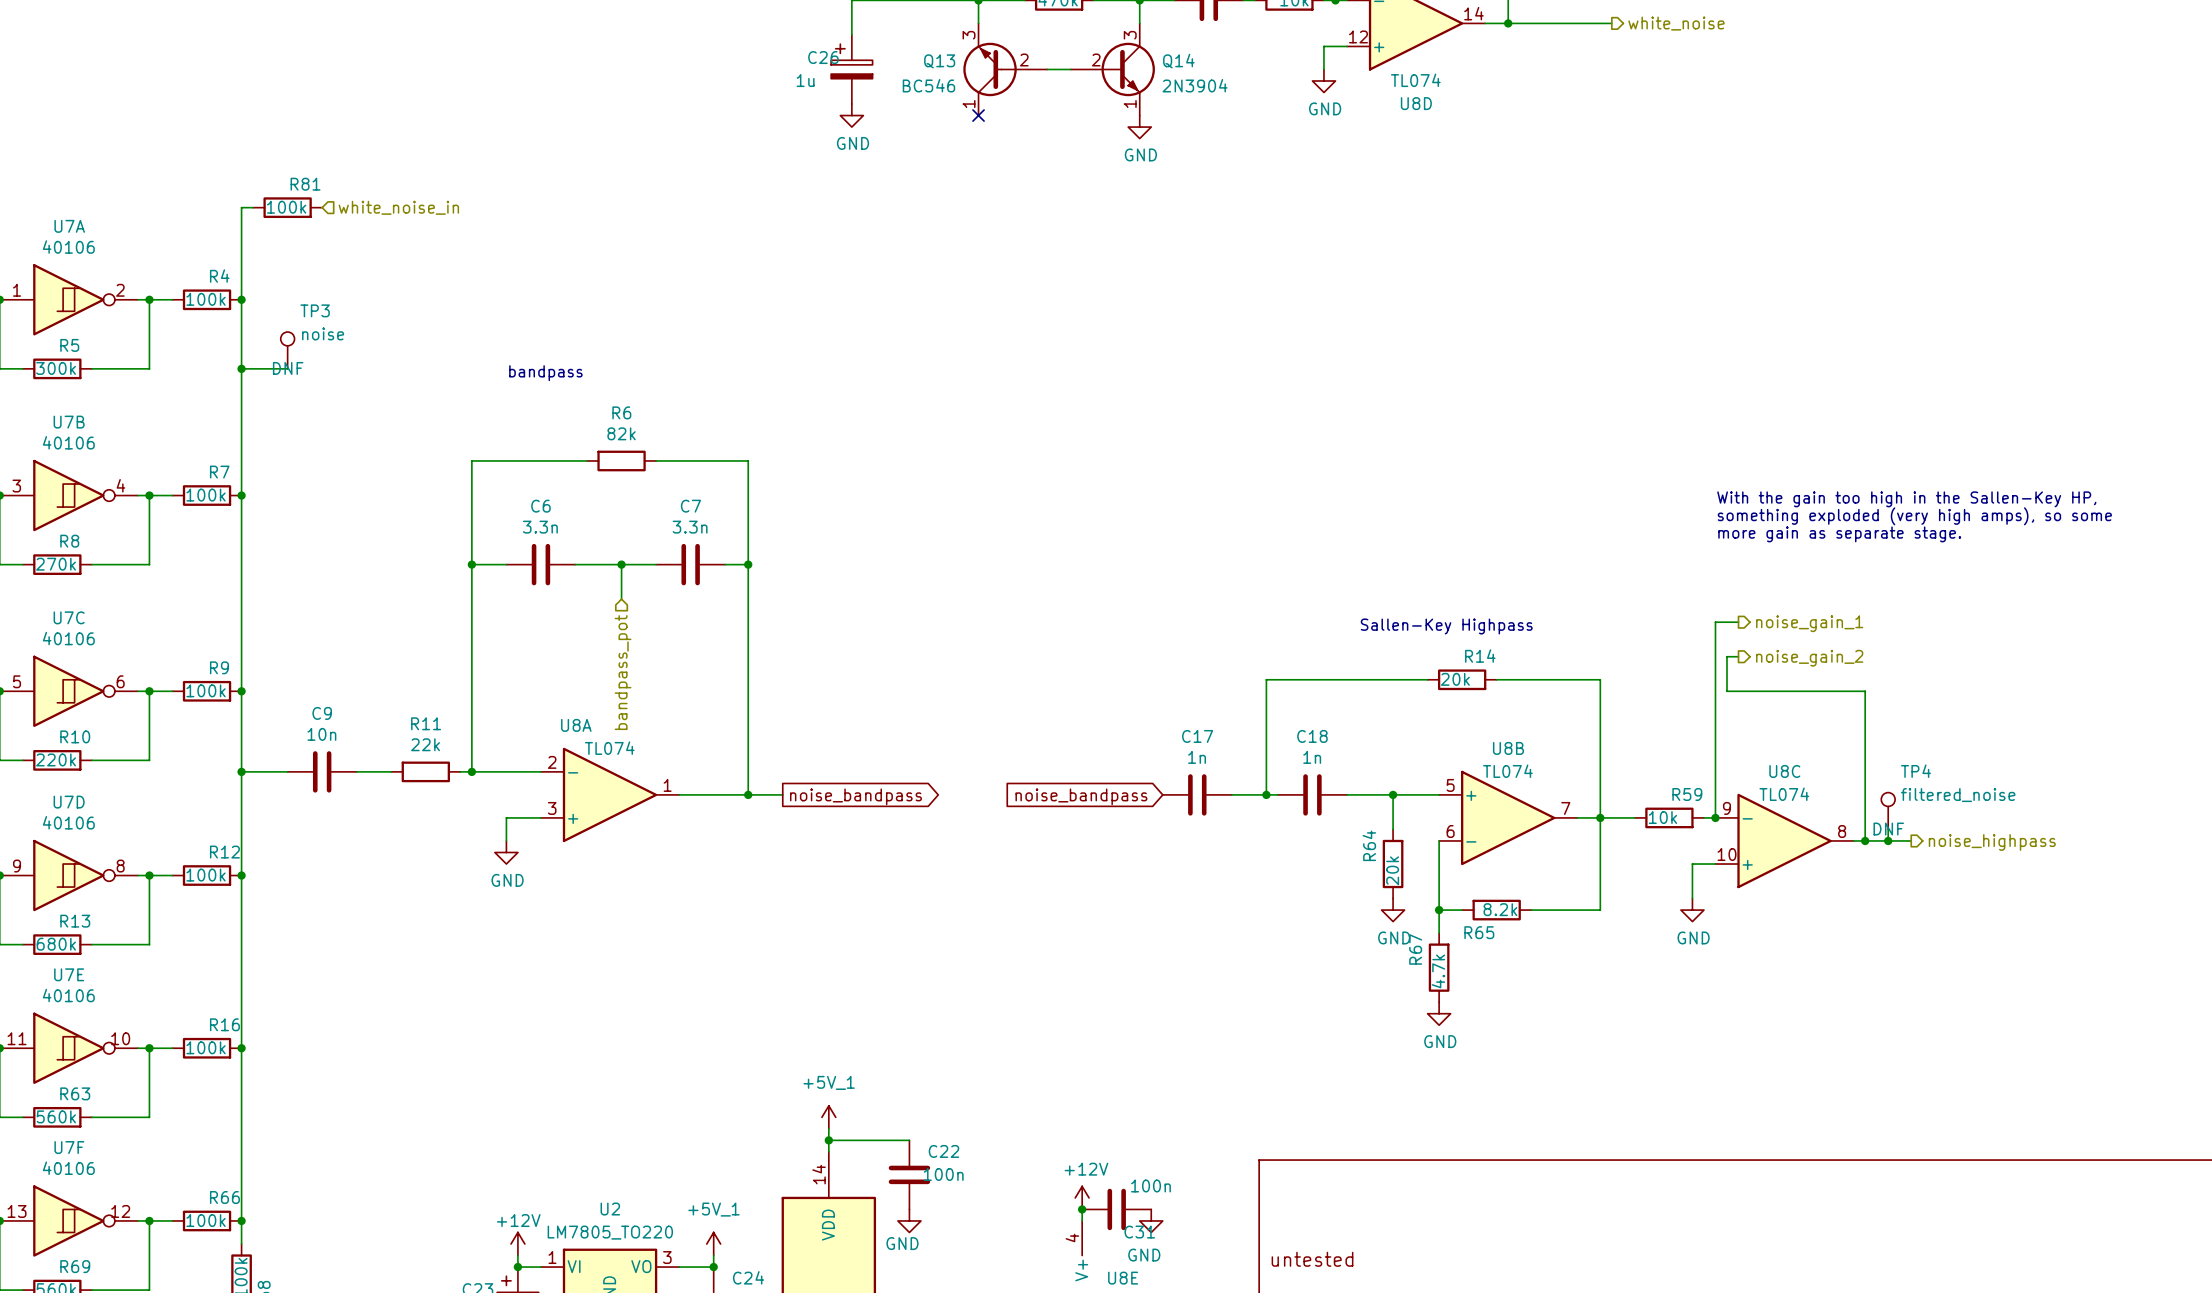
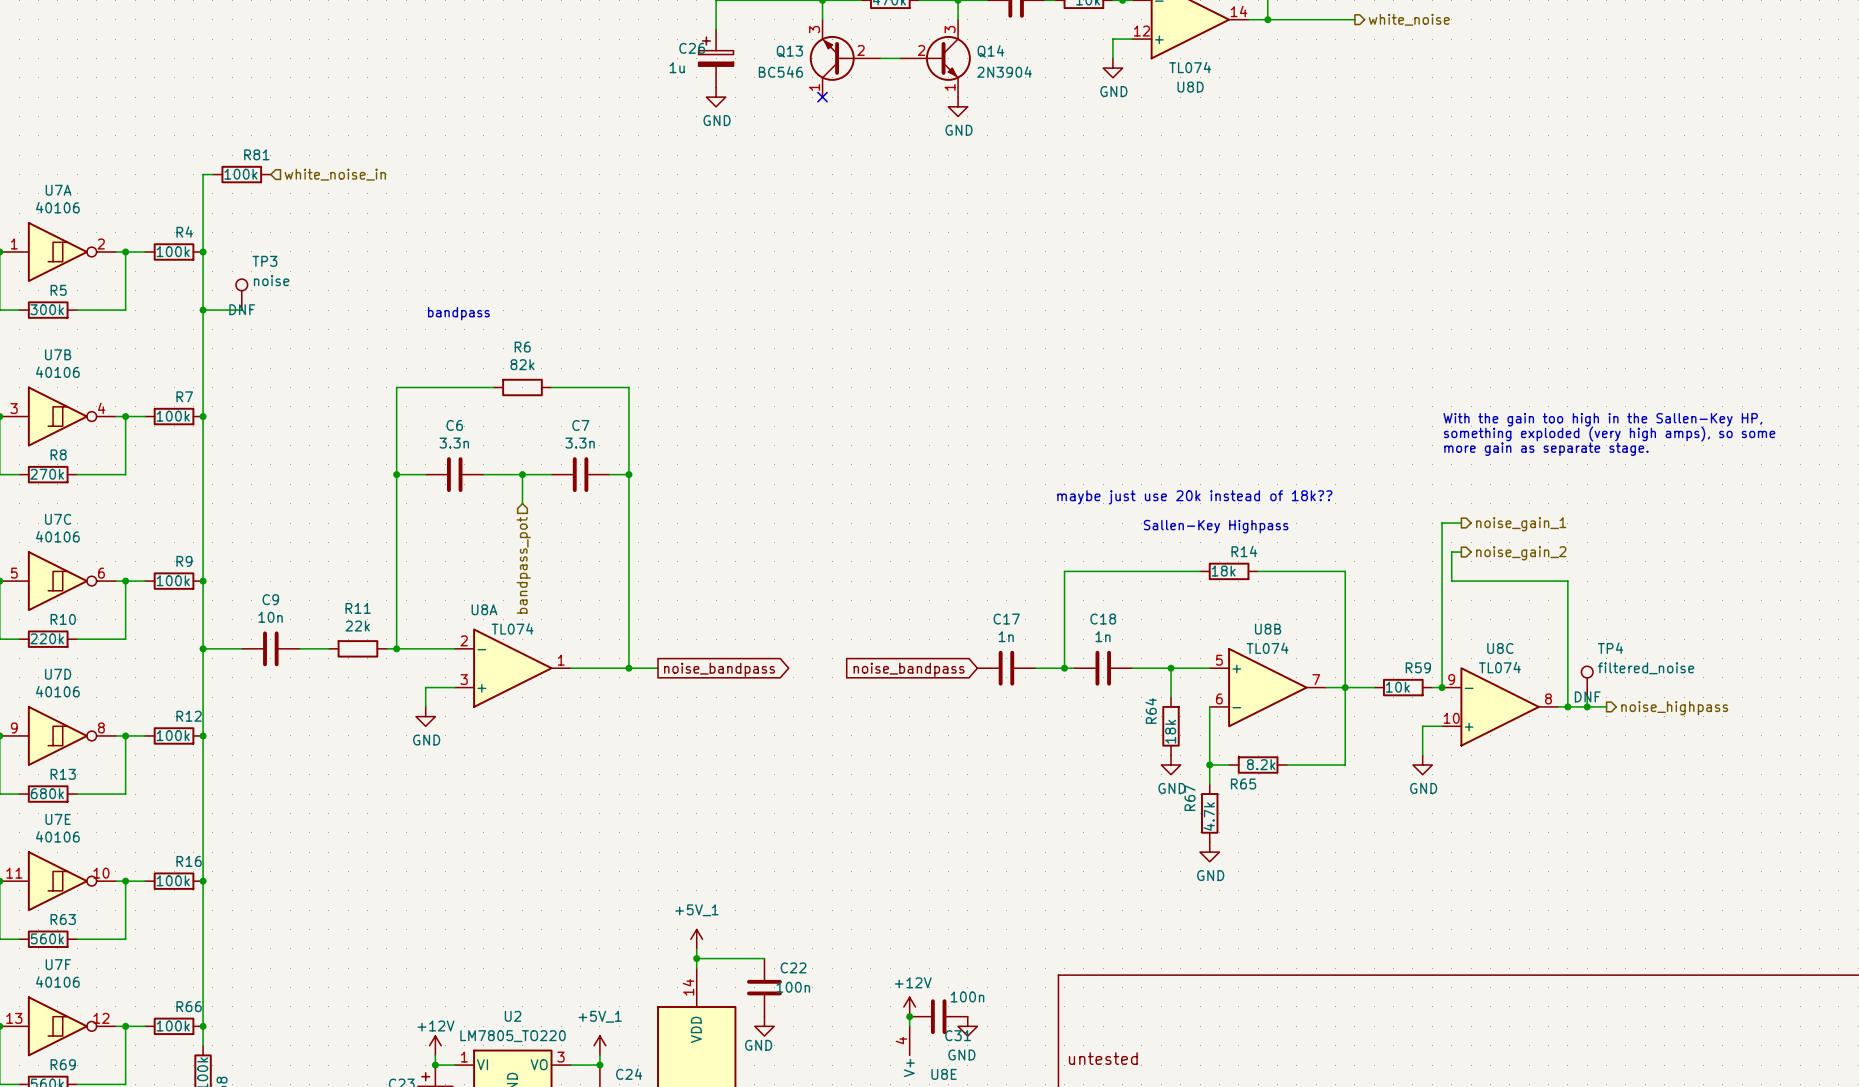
text: none -> maybe just use 20k instead of 18k?? (1194, 497)
R14 value: 20k (1455, 679) -> 18k (1223, 571)
R64 value: 20k (1392, 870) -> 18k (1170, 731)

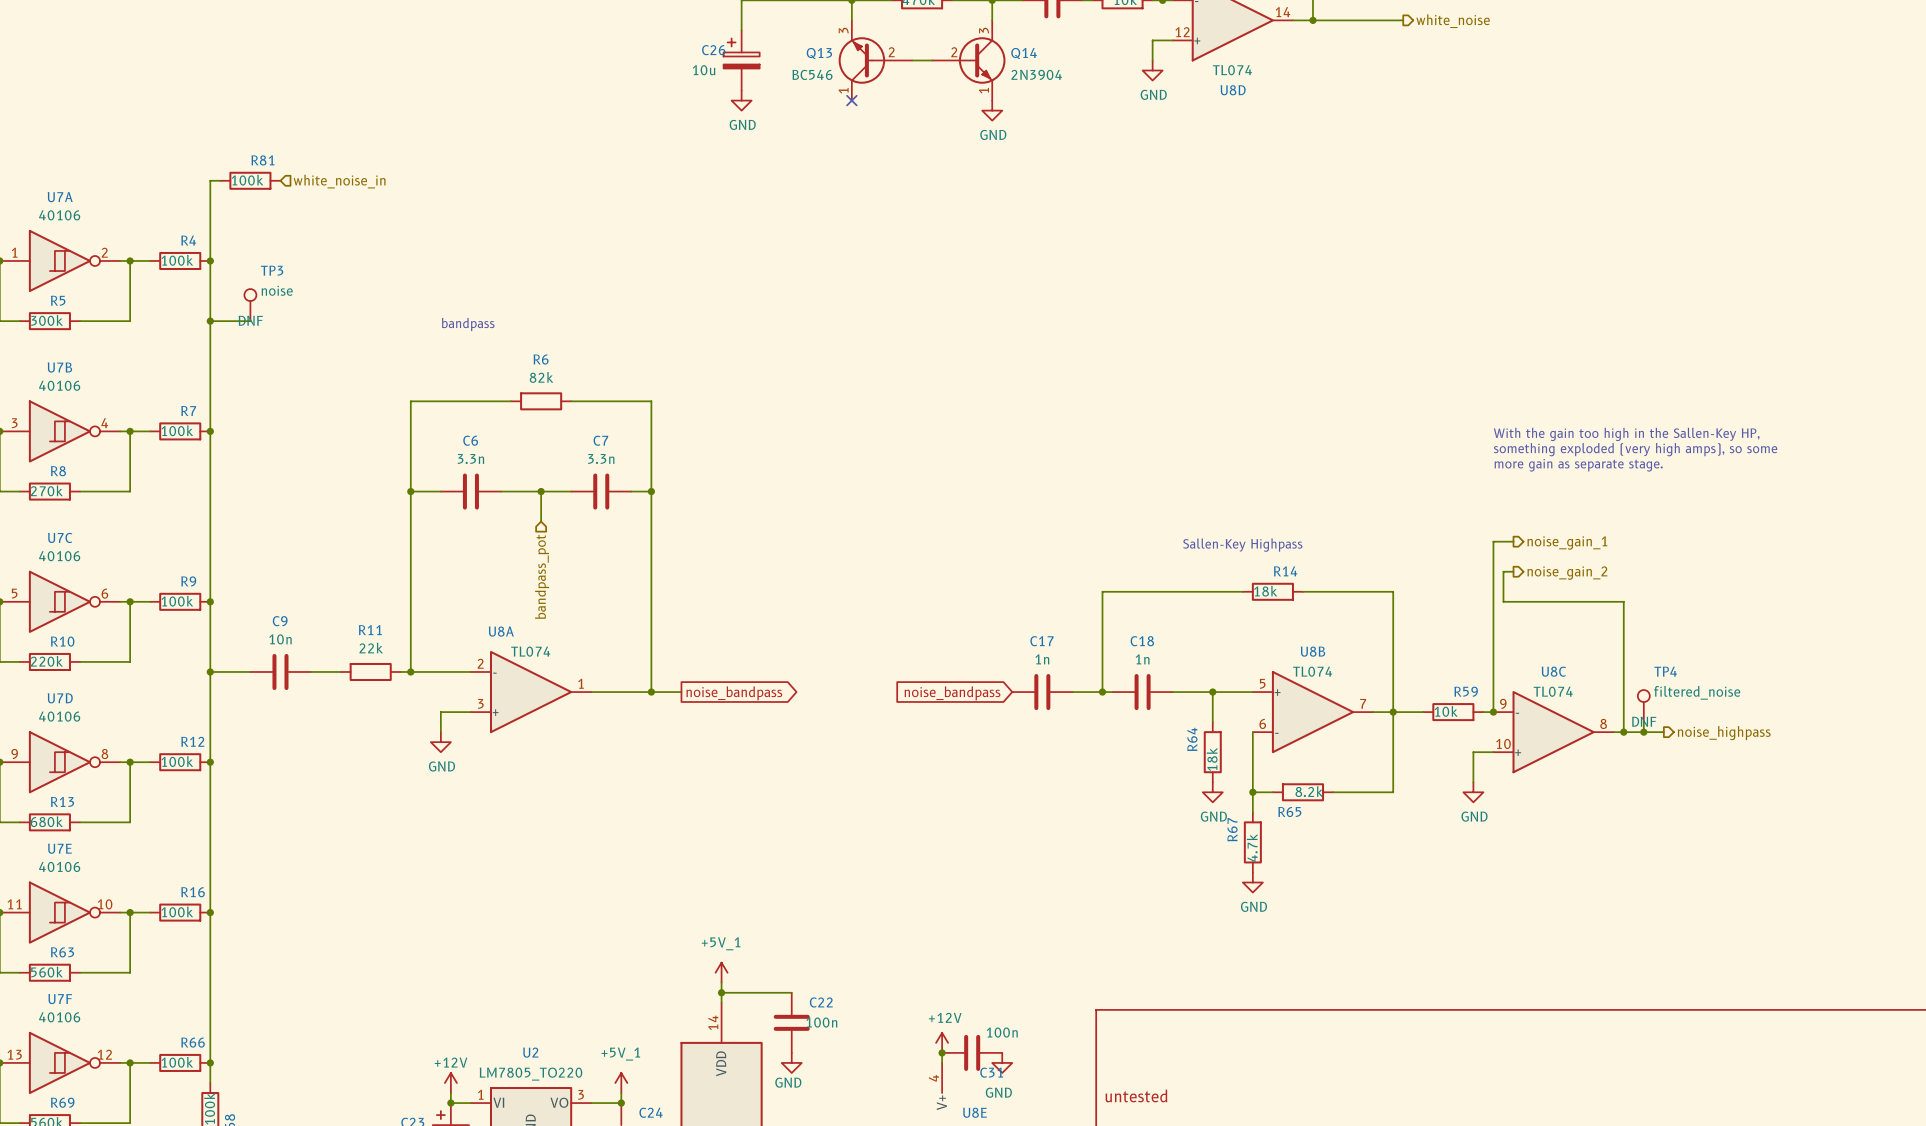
C26 value: 1u (677, 67) -> 10u (704, 70)
text: maybe just use 20k instead of 18k?? (1194, 497) -> none

